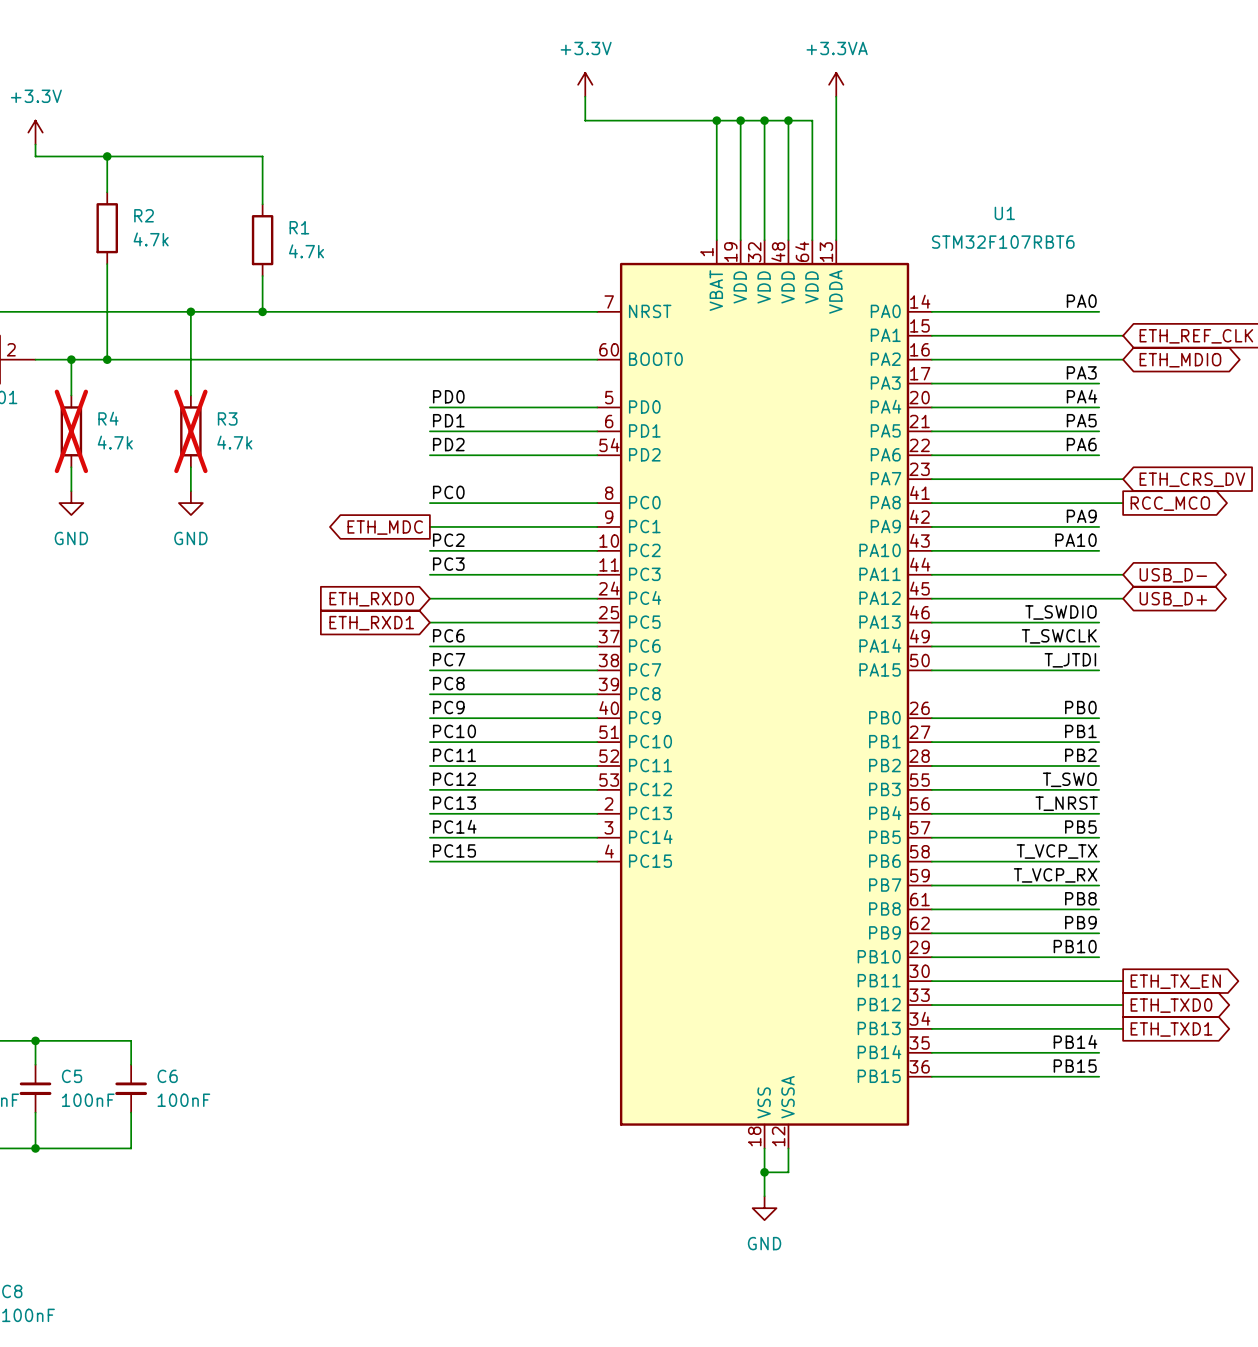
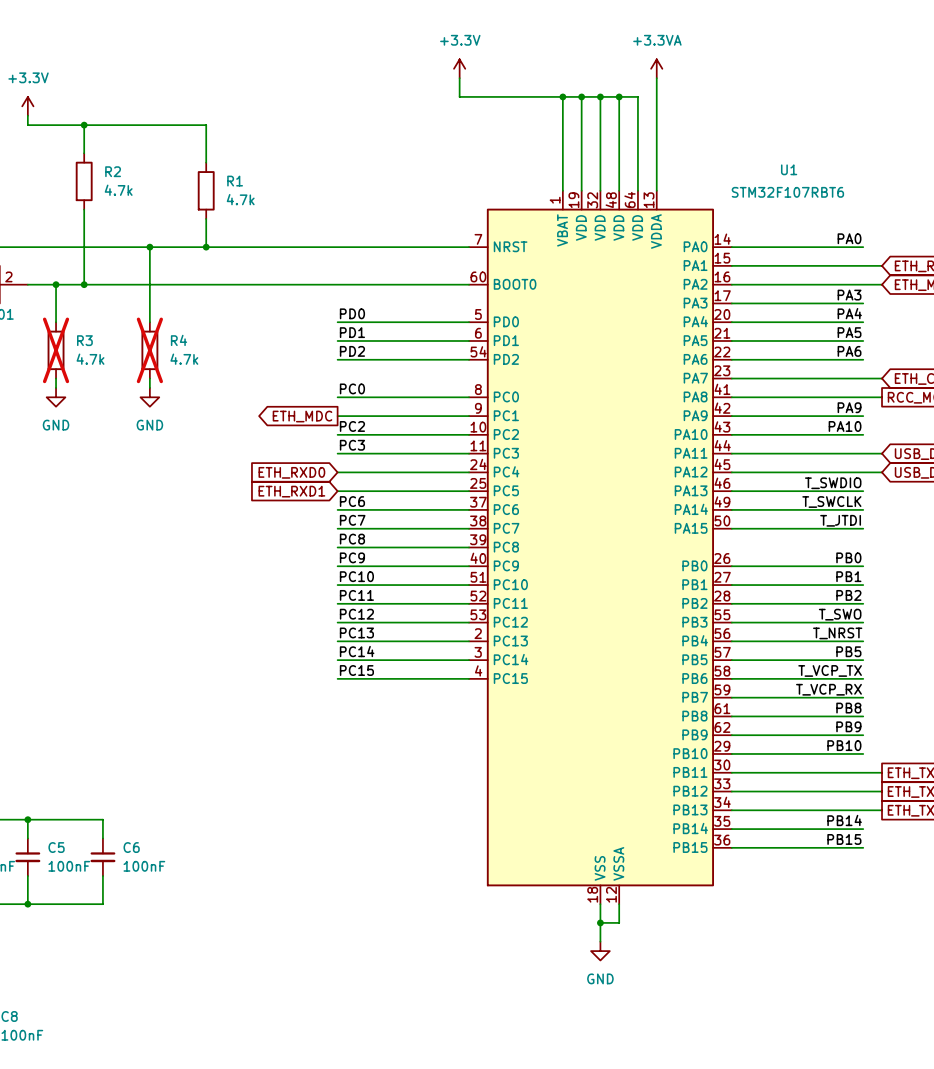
R4 position: (71, 431) -> (149, 350)
R3 position: (190, 431) -> (56, 350)

